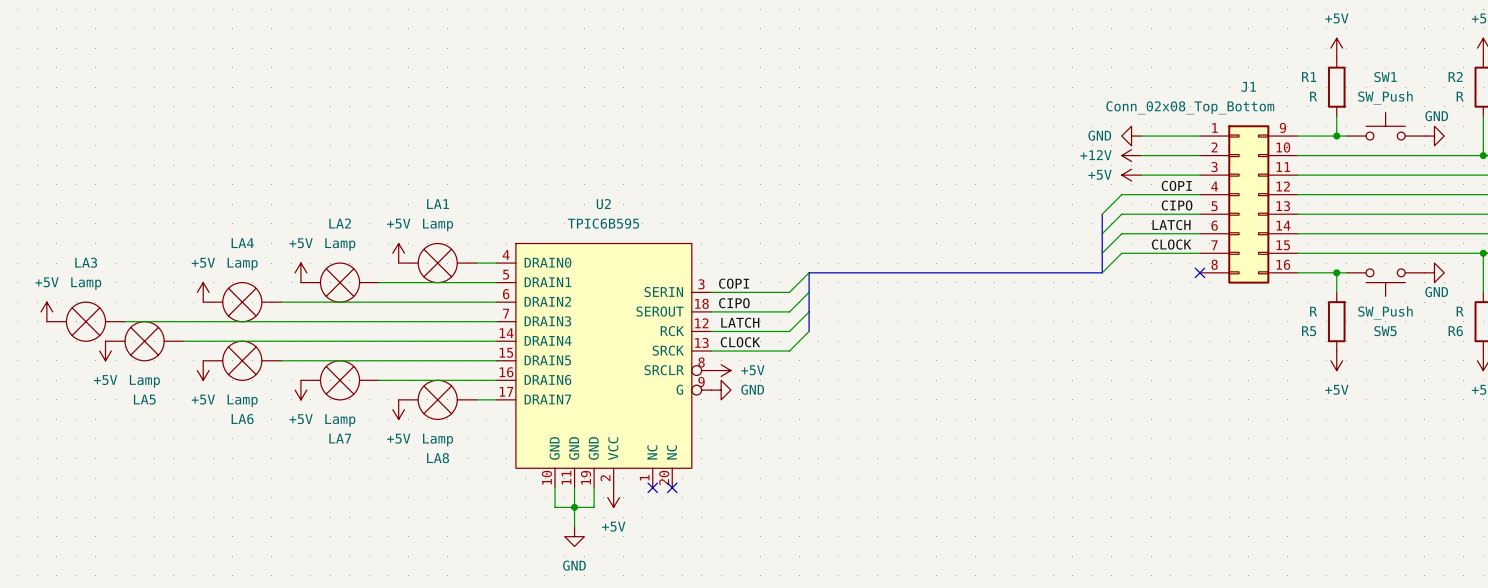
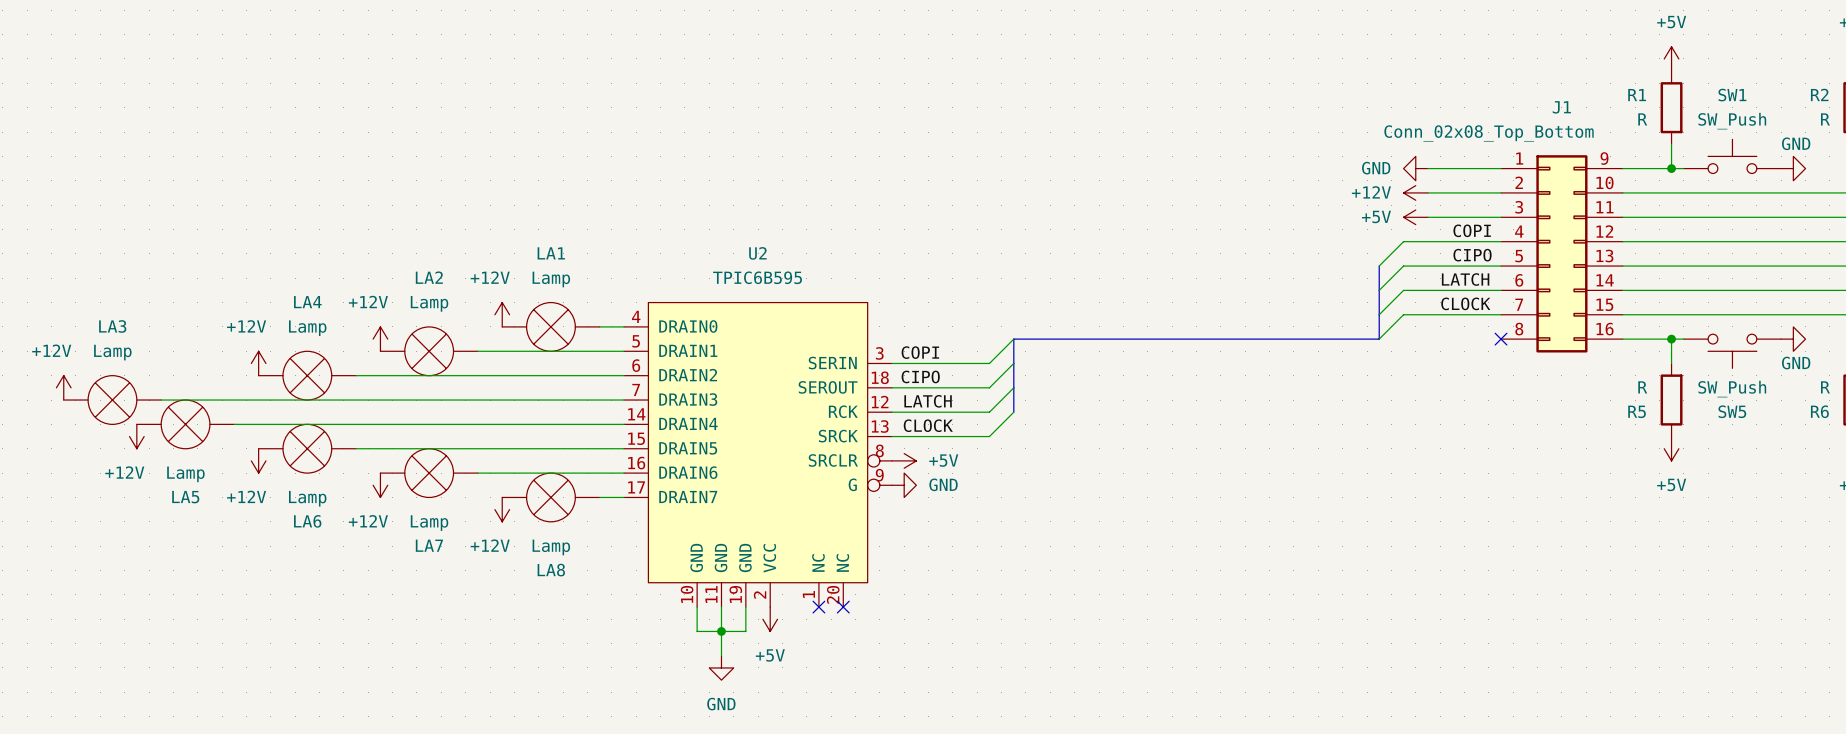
power symbol: +5V (398, 253) -> +12V (502, 314)
power symbol: +5V (300, 272) -> +12V (380, 339)
power symbol: +5V (203, 292) -> +12V (258, 363)
power symbol: +5V (46, 311) -> +12V (63, 387)
power symbol: +5V (105, 351) -> +12V (136, 436)
power symbol: +5V (203, 370) -> +12V (258, 460)
power symbol: +5V (300, 390) -> +12V (380, 485)
power symbol: +5V (398, 409) -> +12V (502, 509)

